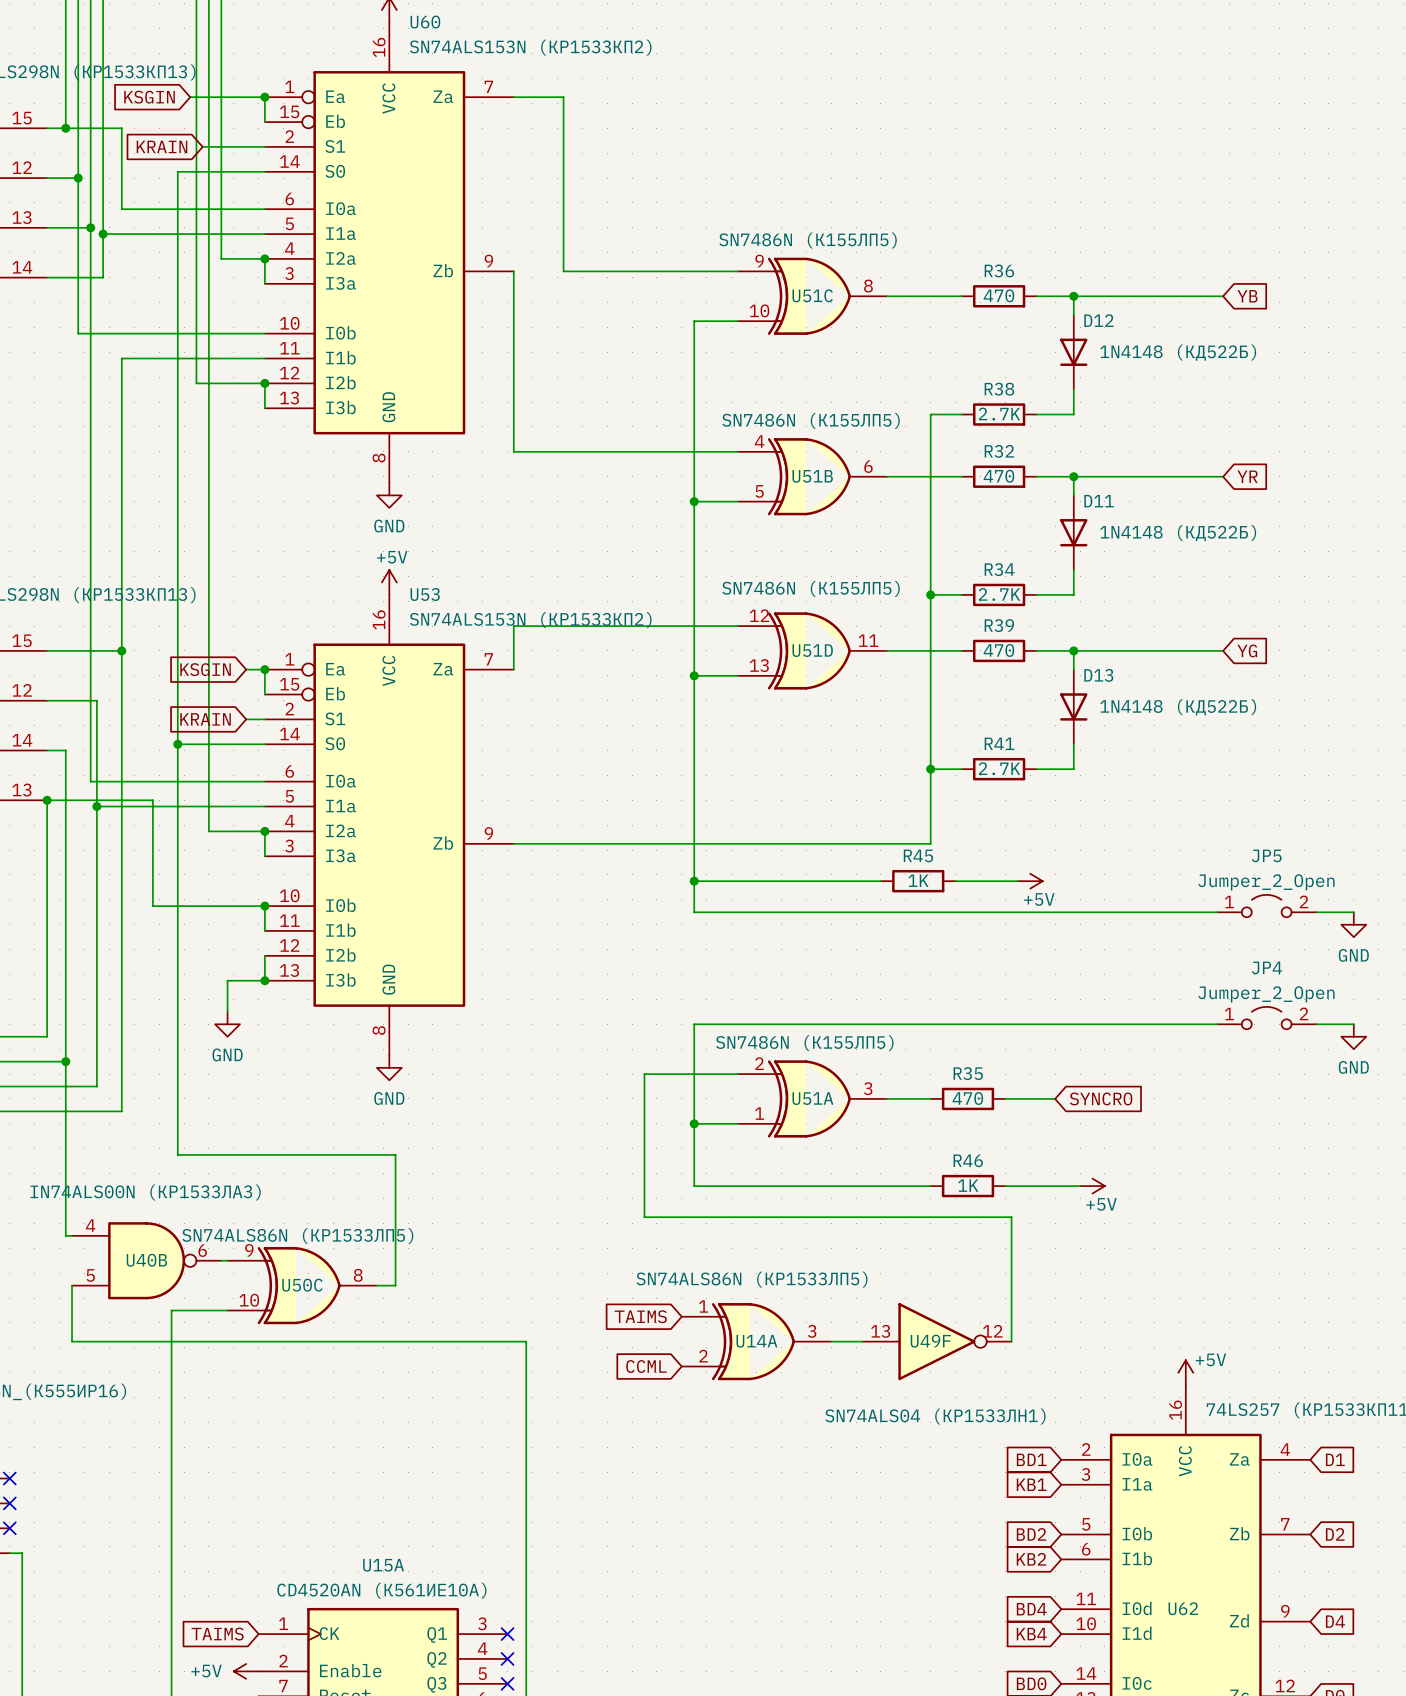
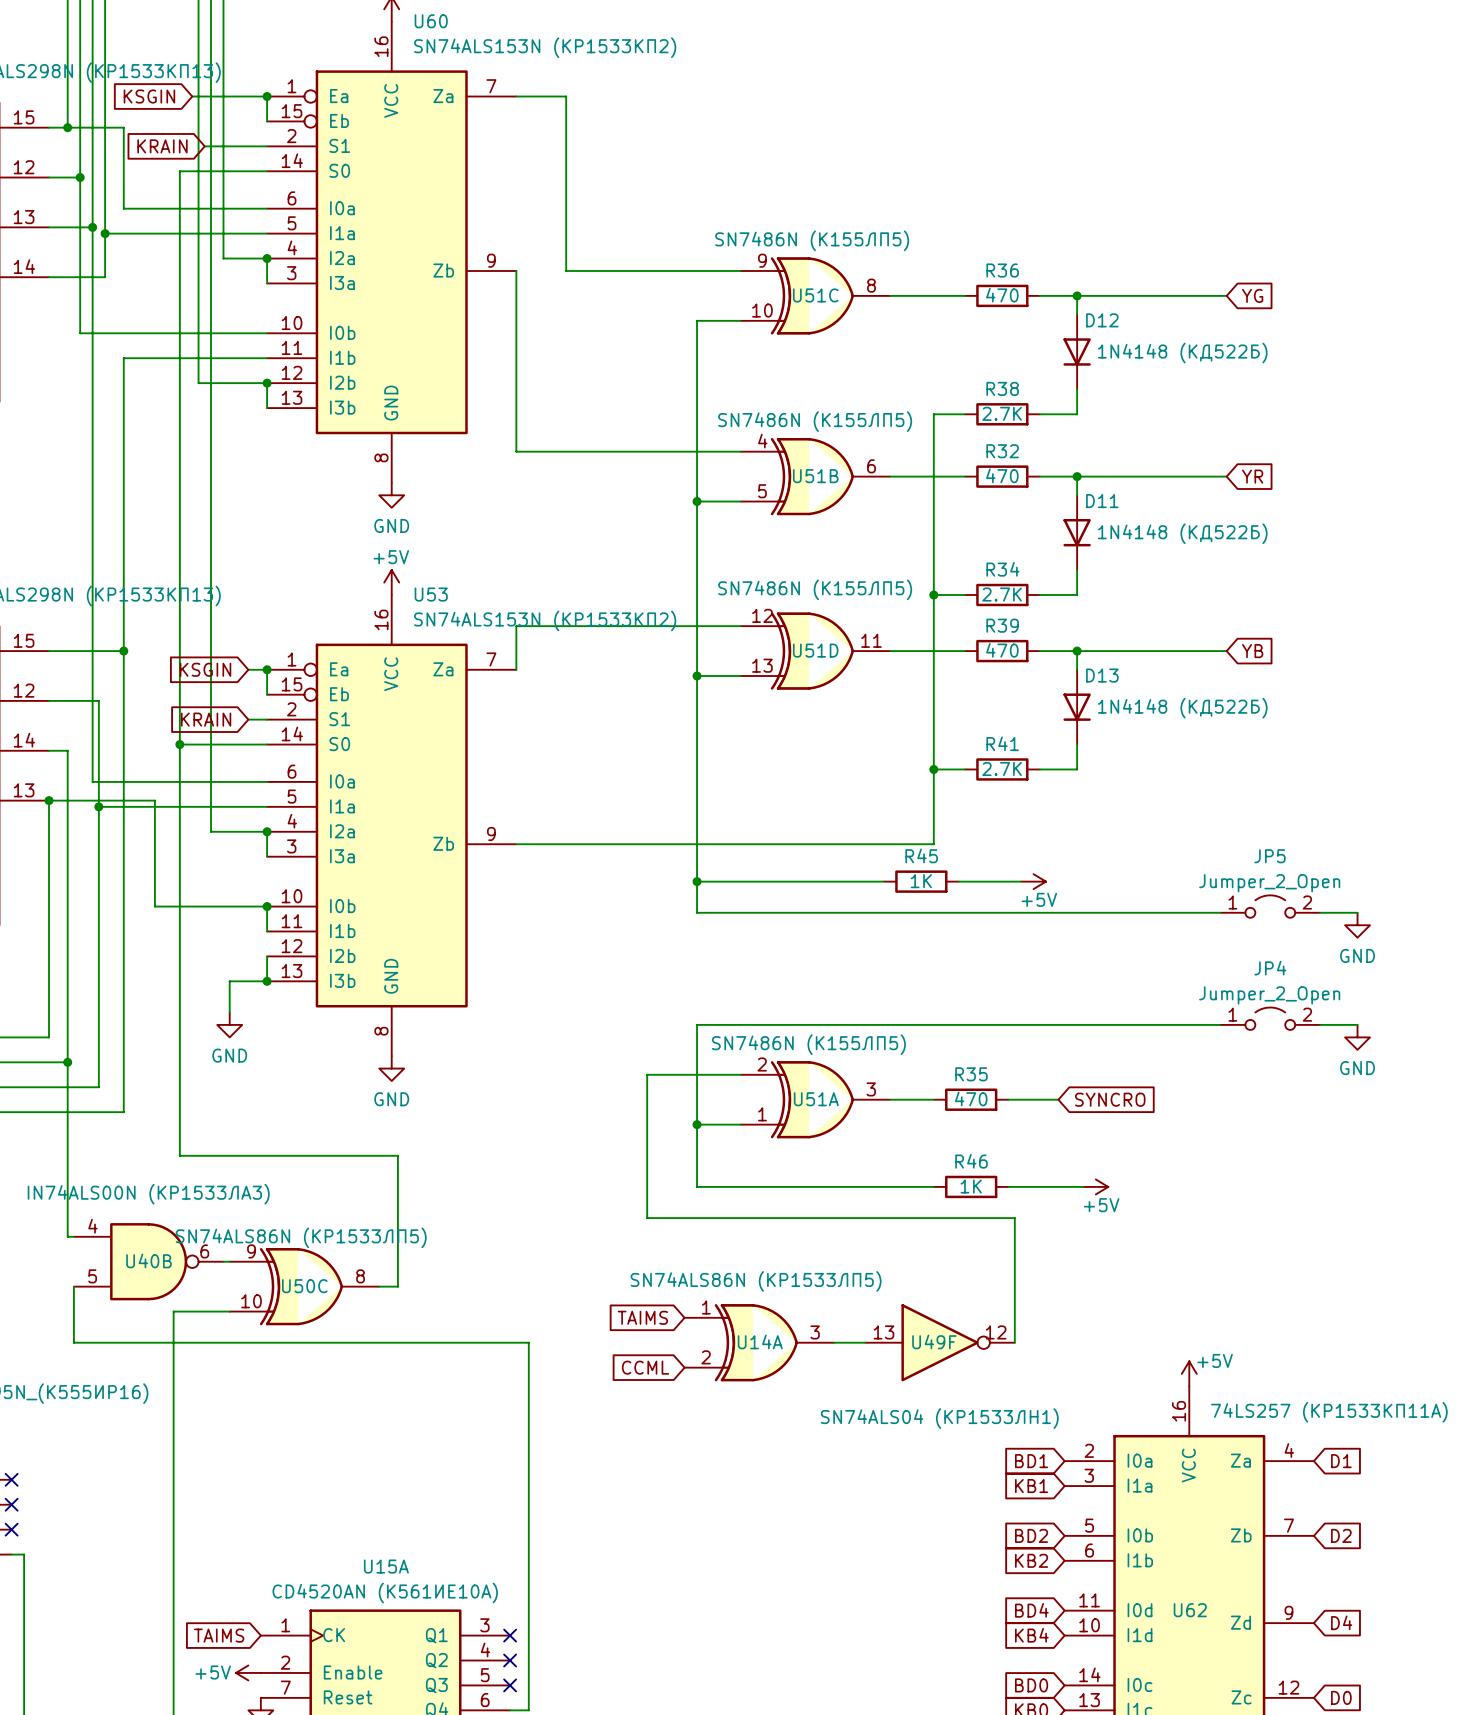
global label: YB (1247, 296) -> YG (1252, 295)
global label: YG (1247, 650) -> YB (1252, 651)

